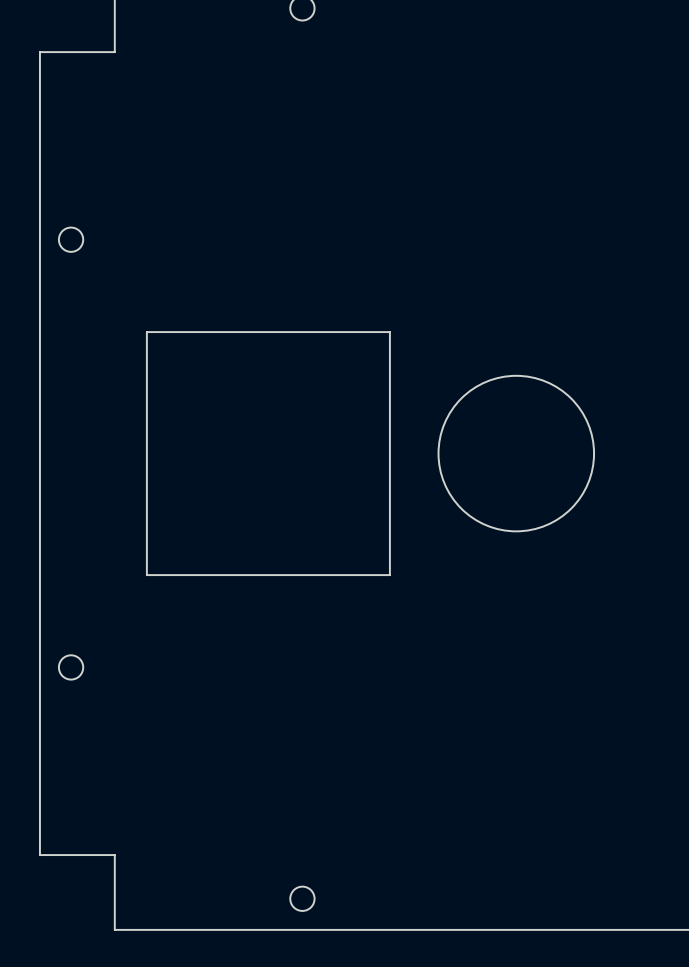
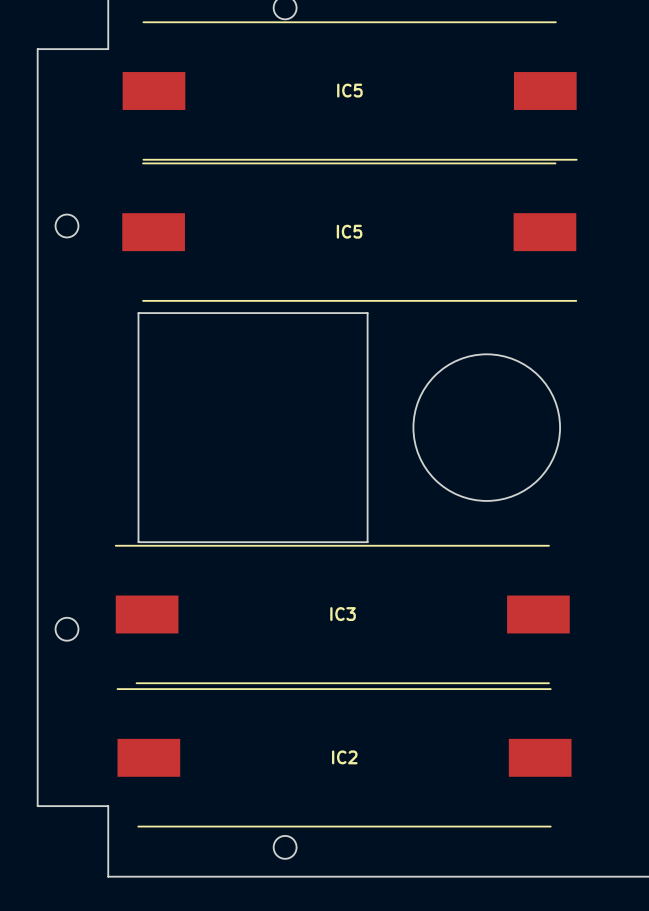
IC5: none -> (350, 91)
IC5: none -> (349, 232)
IC3: none -> (342, 614)
IC2: none -> (344, 757)

